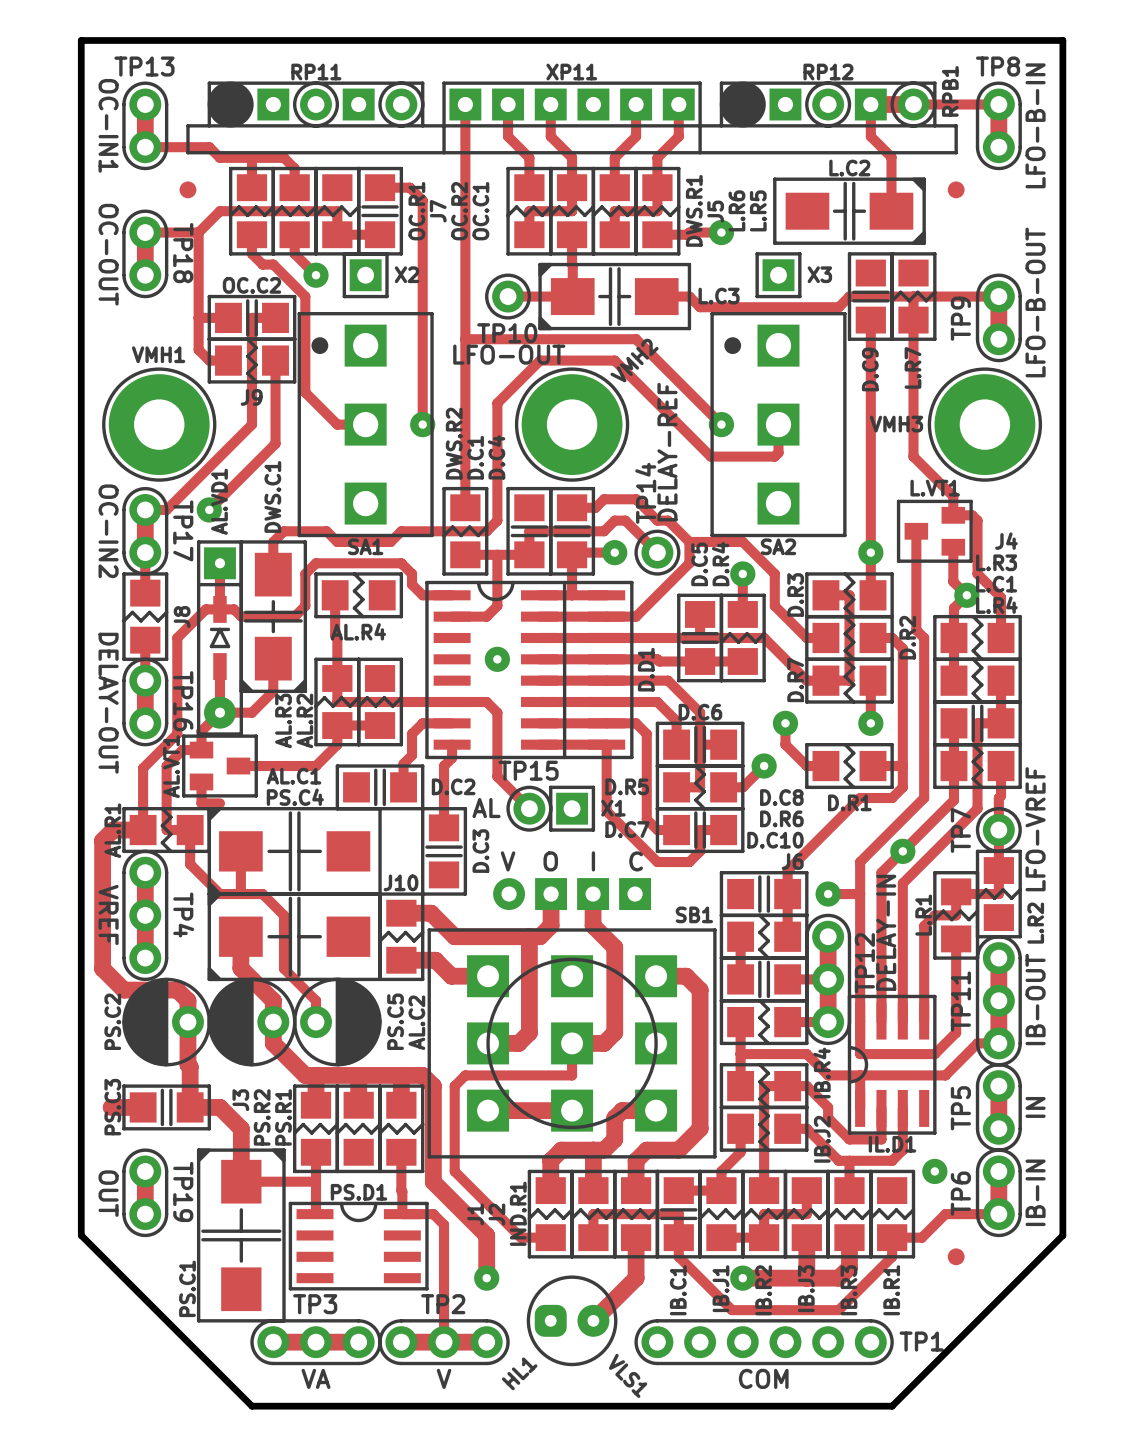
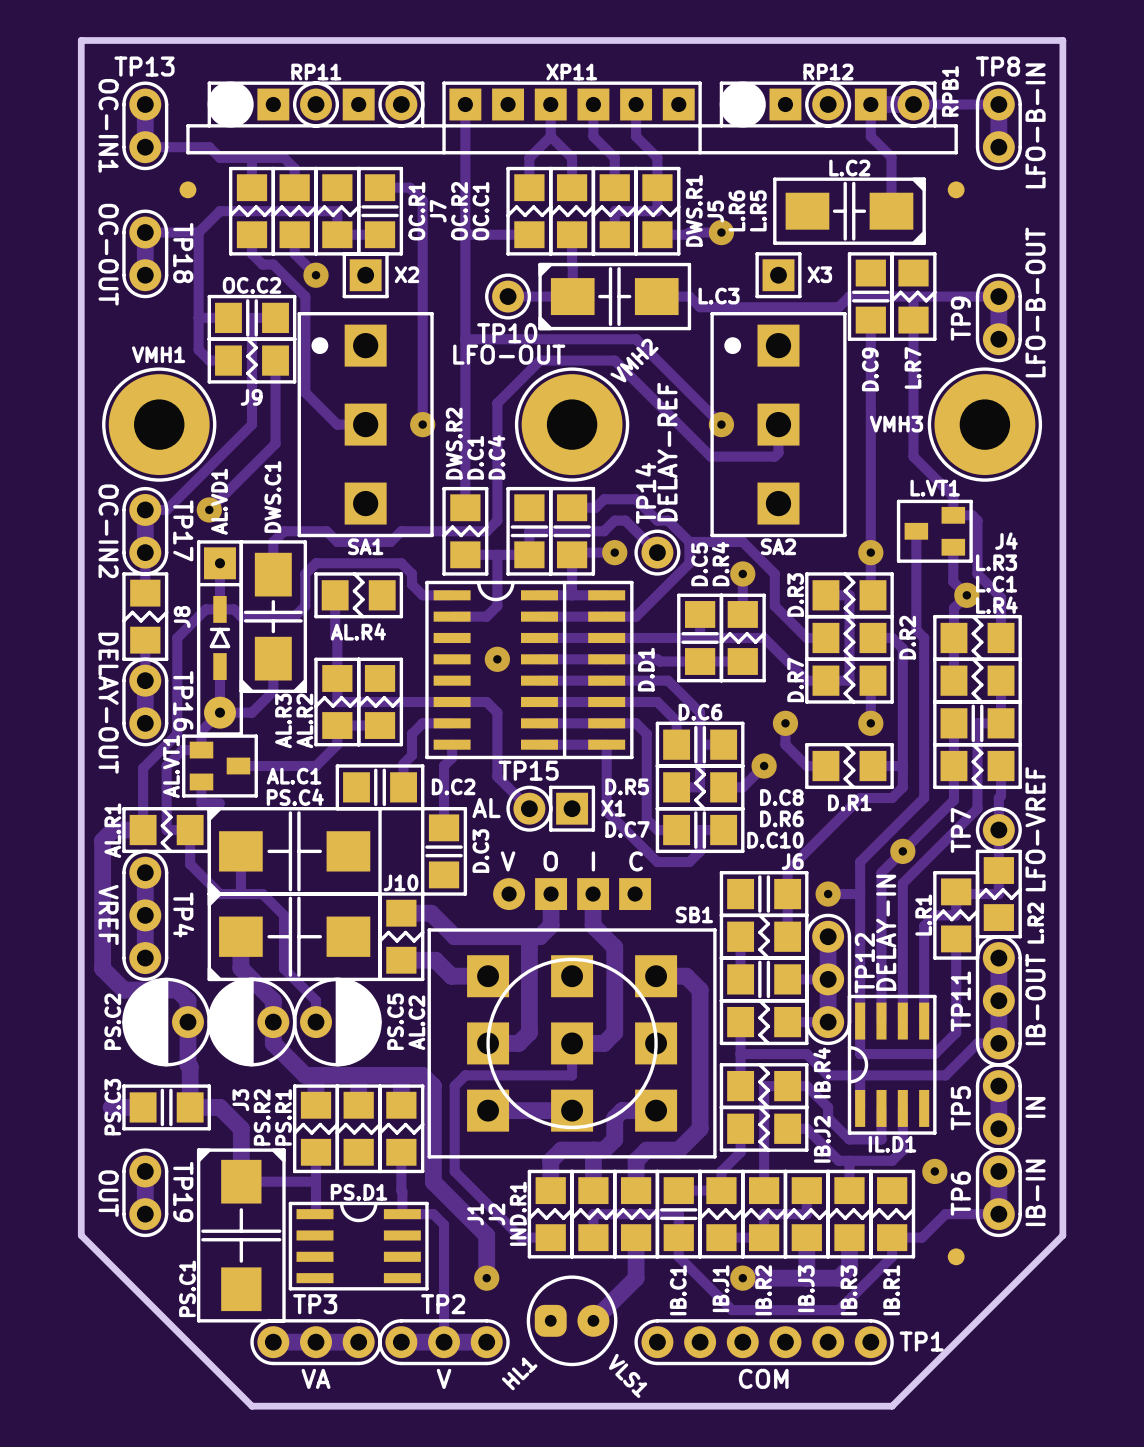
track: (508, 104) (508, 136) (529, 157) -> (550, 136) (529, 157)
track: none -> (593, 104) (593, 136) (614, 157)
track: (678, 104) (678, 136) (657, 157) -> none
track: (636, 136) (614, 157) -> (636, 136) (657, 157)
track: (572, 187) (572, 211) (529, 211) (529, 234) -> (465, 234) (529, 234)

